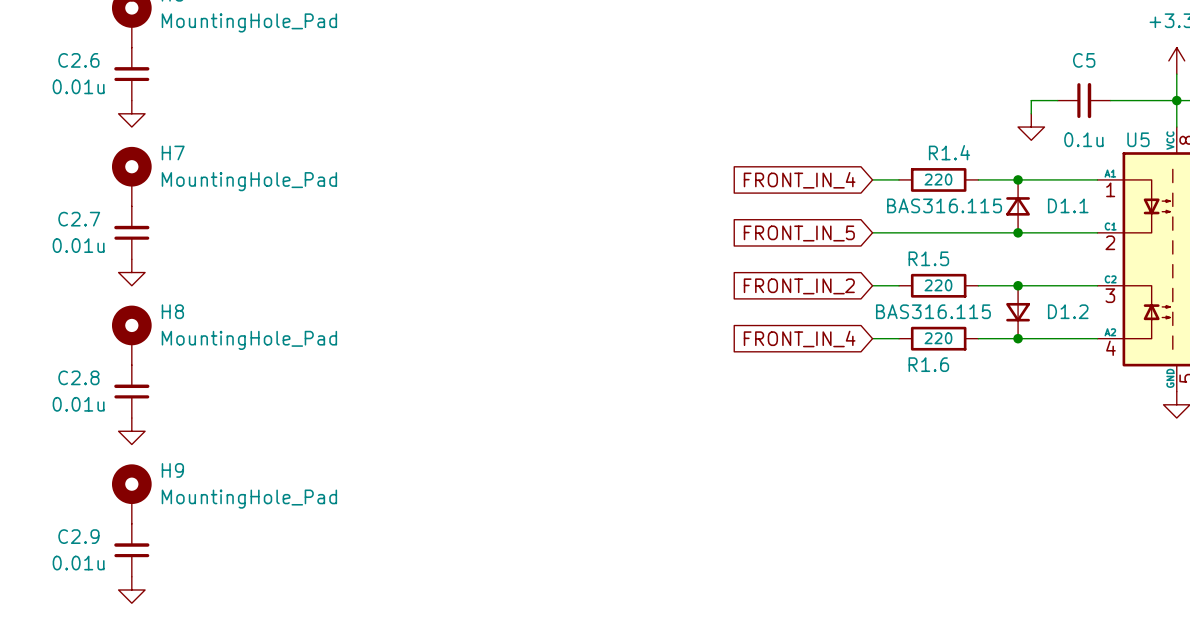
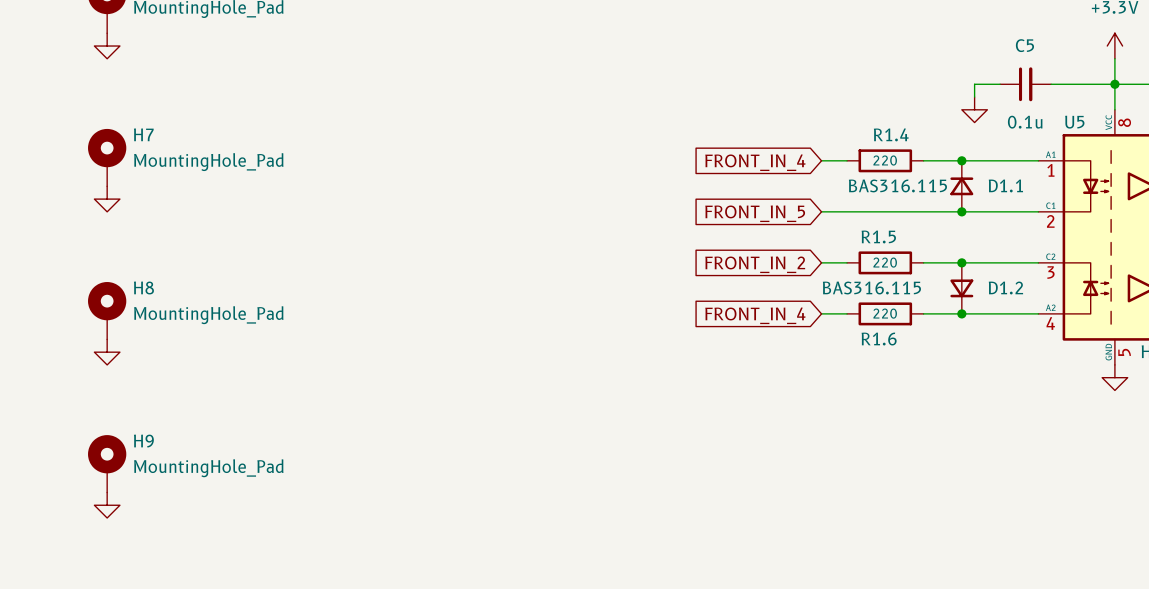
power symbol: none -> (107, 46)
C2.6: 0.01u (131, 74) -> none
power symbol: (131, 113) -> none
power symbol: none -> (107, 199)
C2.7: 0.01u (131, 232) -> none
power symbol: (131, 272) -> none
power symbol: none -> (107, 352)
C2.8: 0.01u (131, 391) -> none
power symbol: (131, 431) -> none
power symbol: none -> (107, 505)
C2.9: 0.01u (131, 550) -> none
power symbol: (131, 589) -> none

